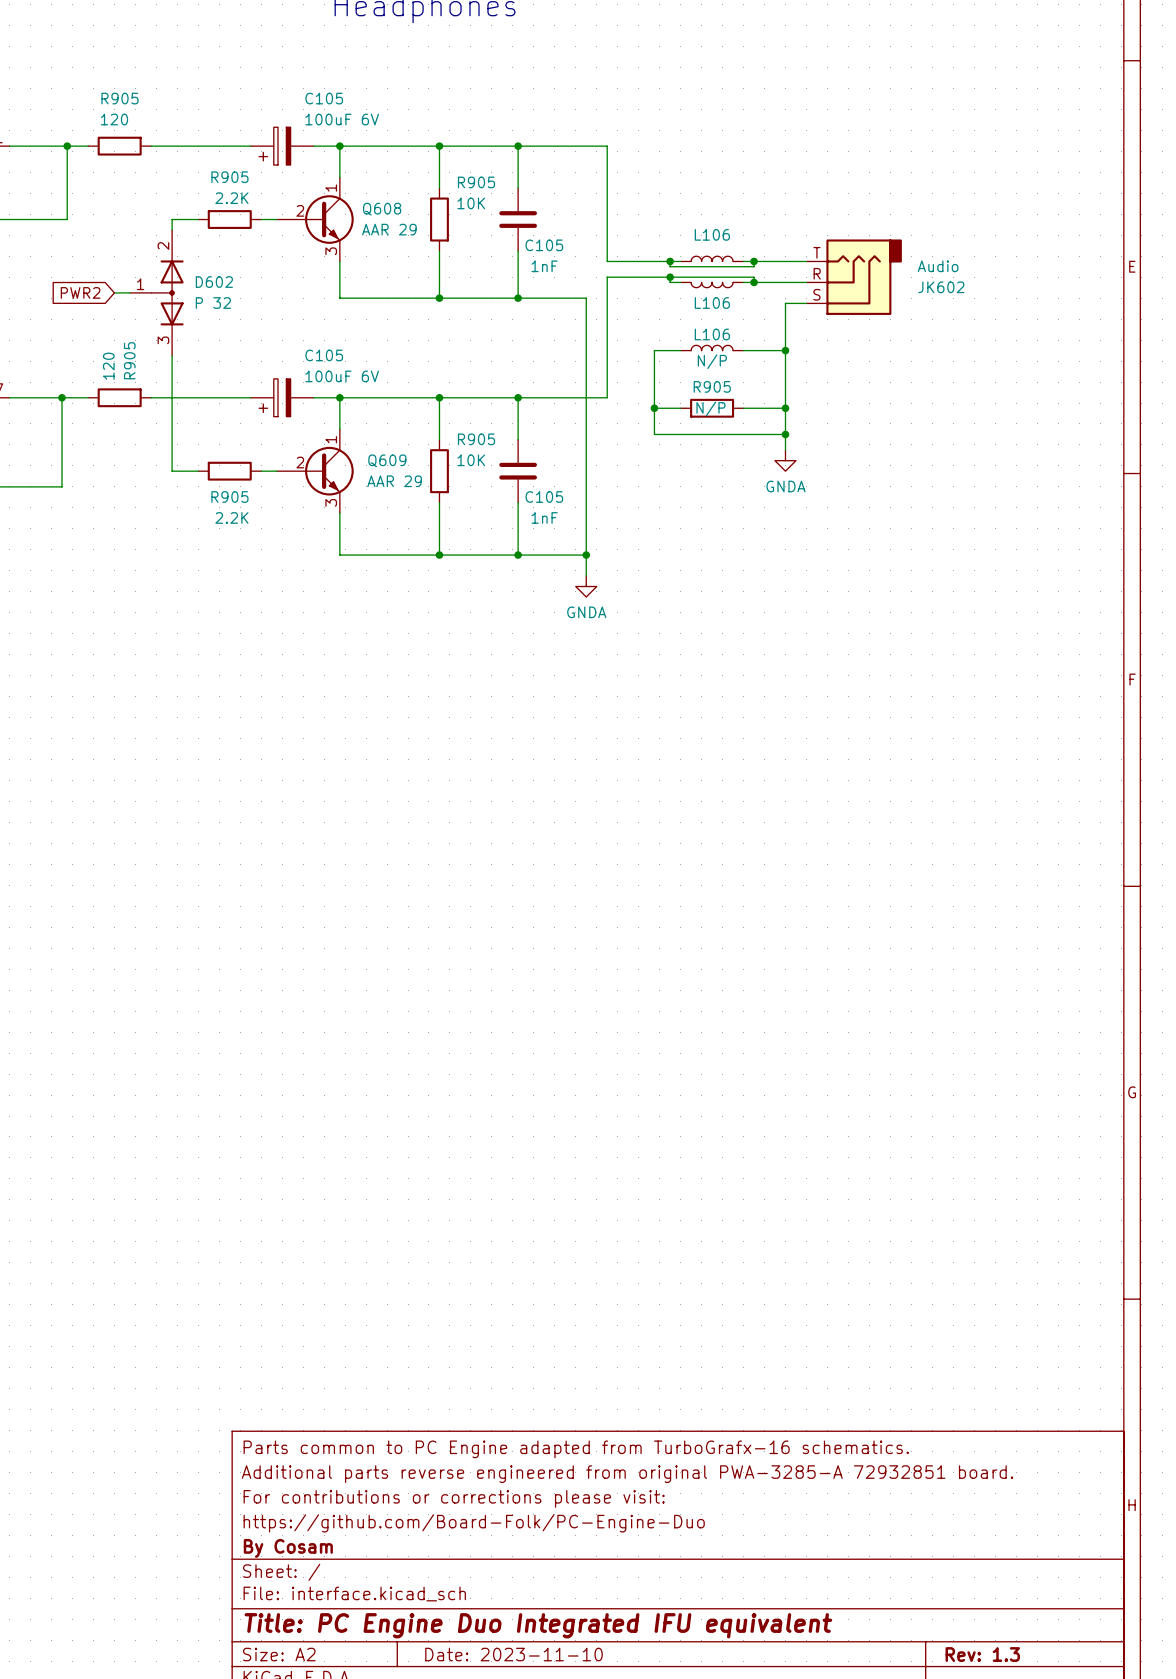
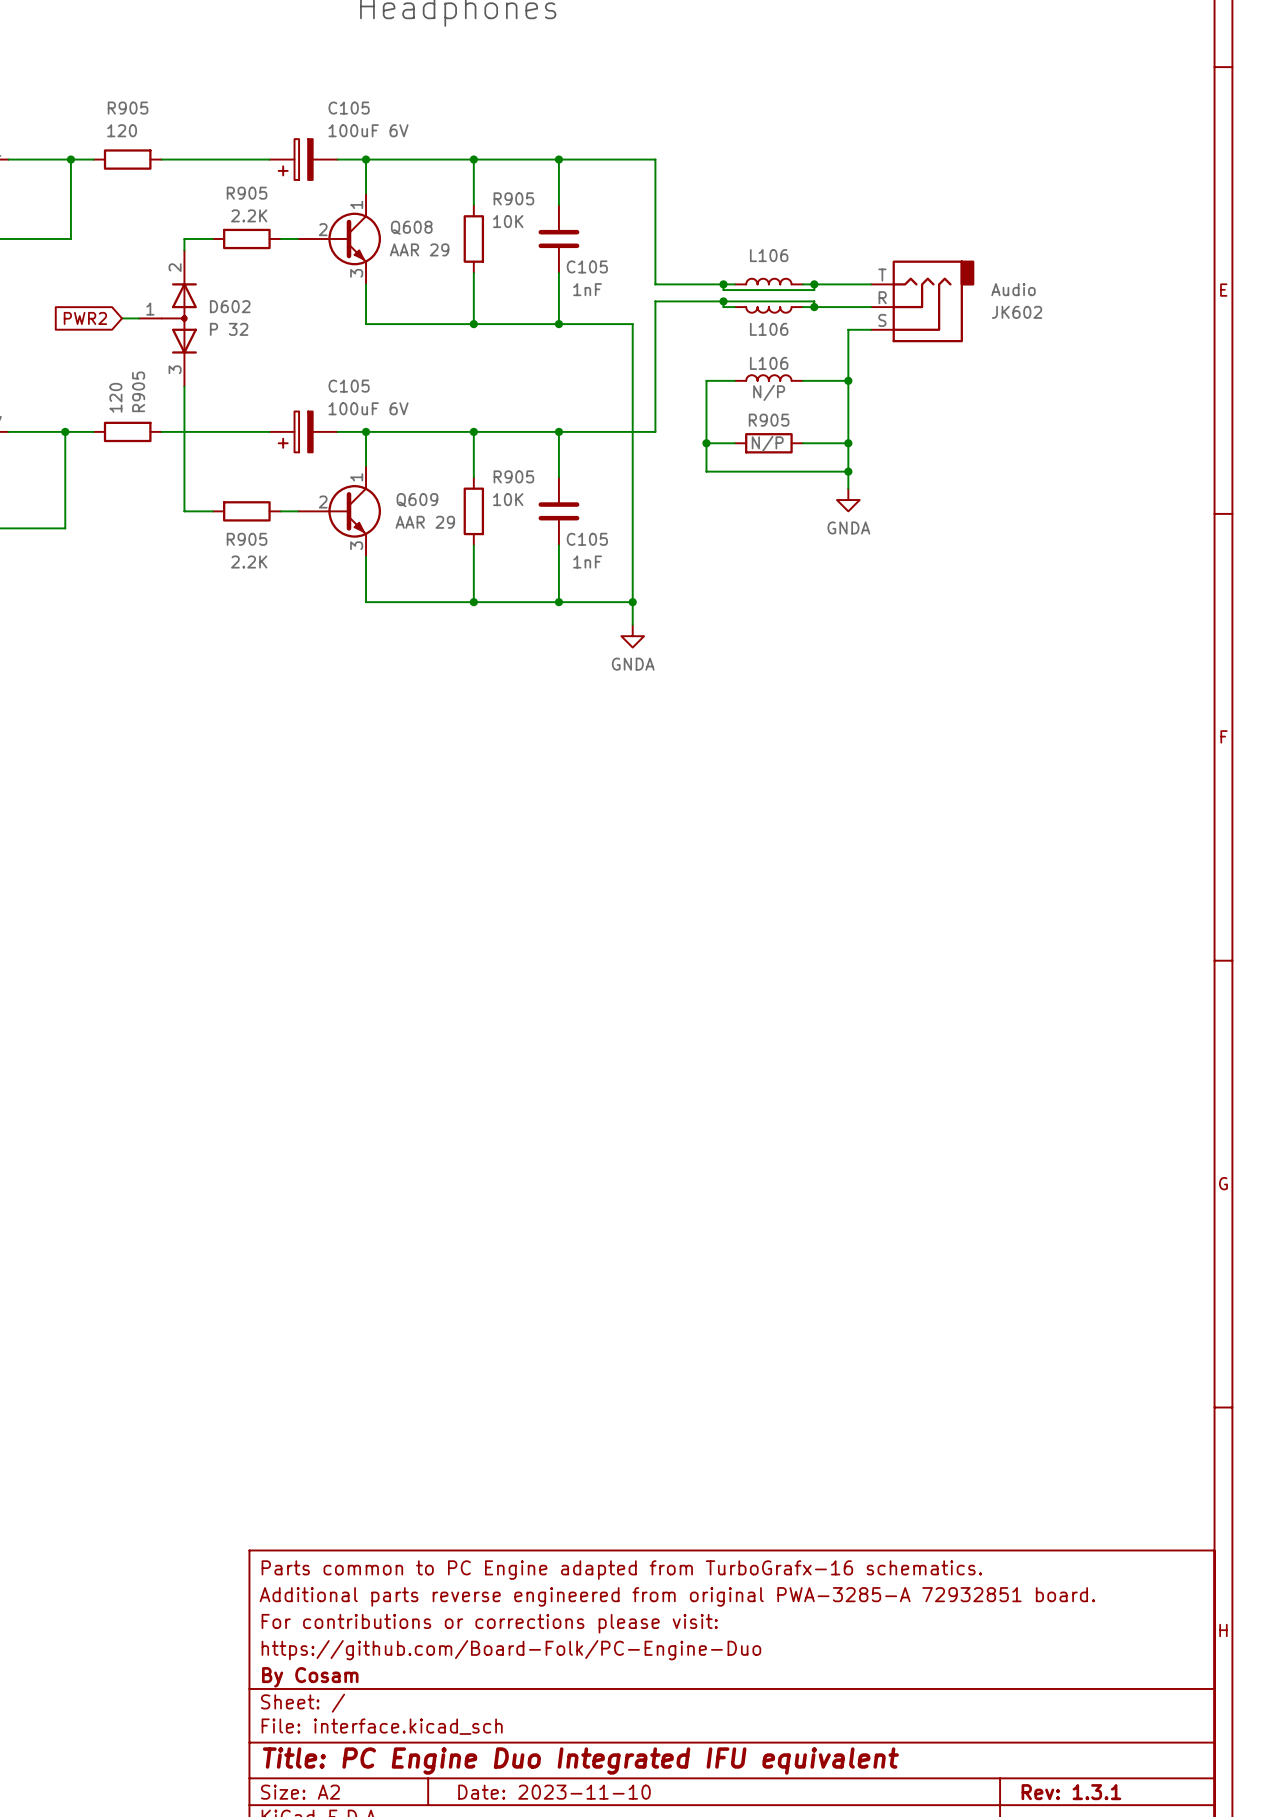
title block: Rev: 1.3 (982, 1654) -> Rev: 1.3.1 (1071, 1792)

